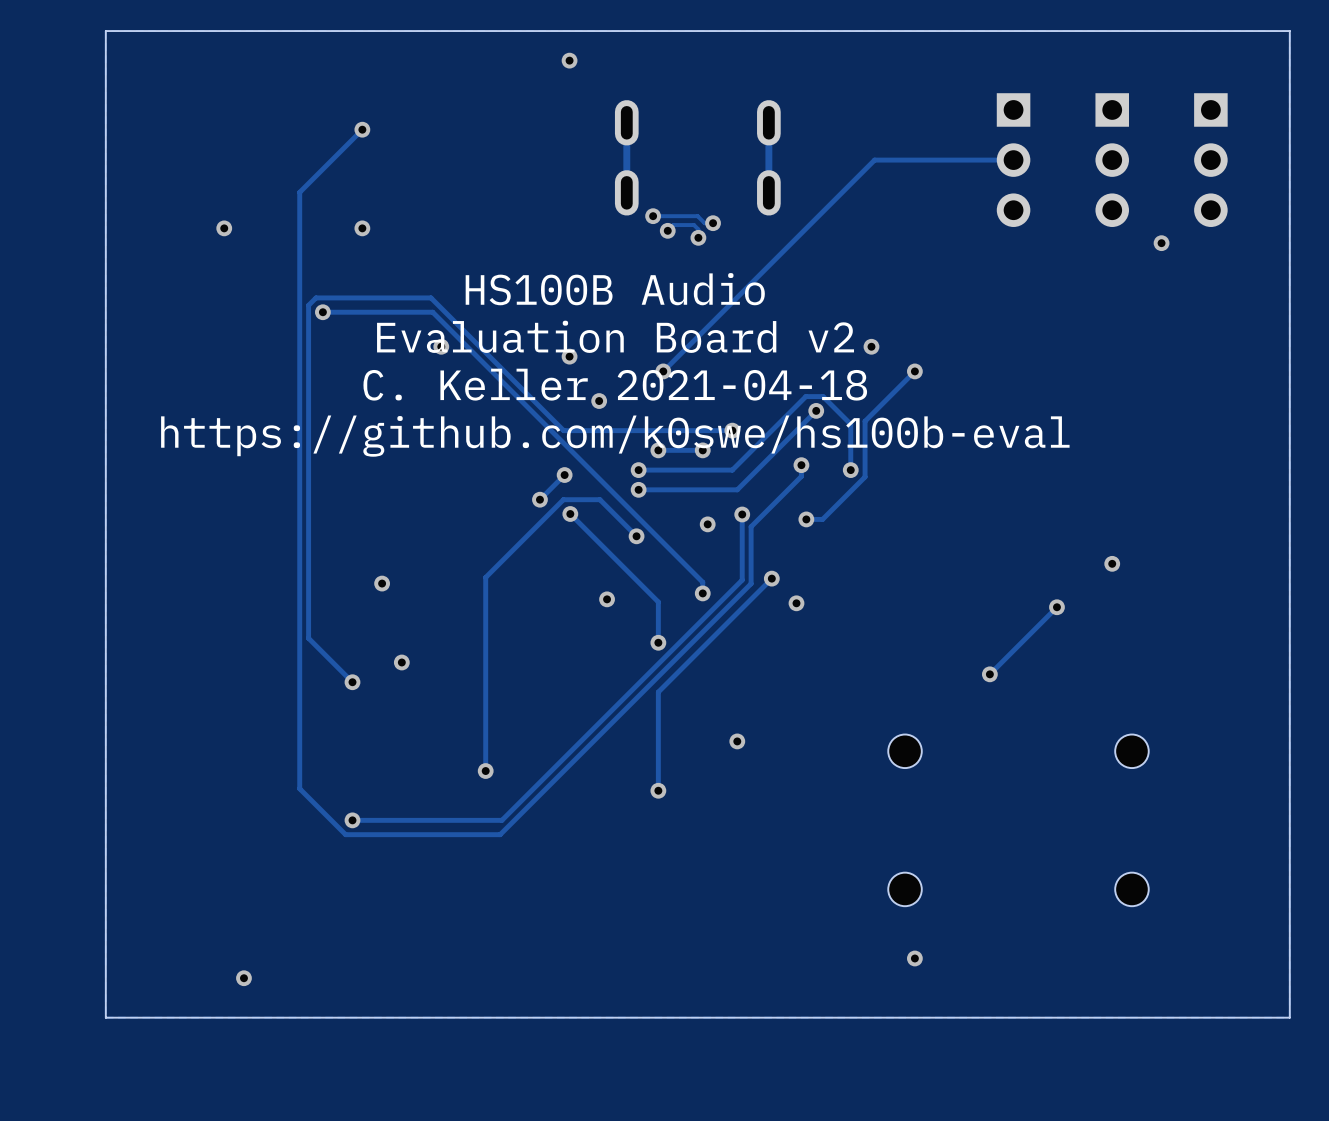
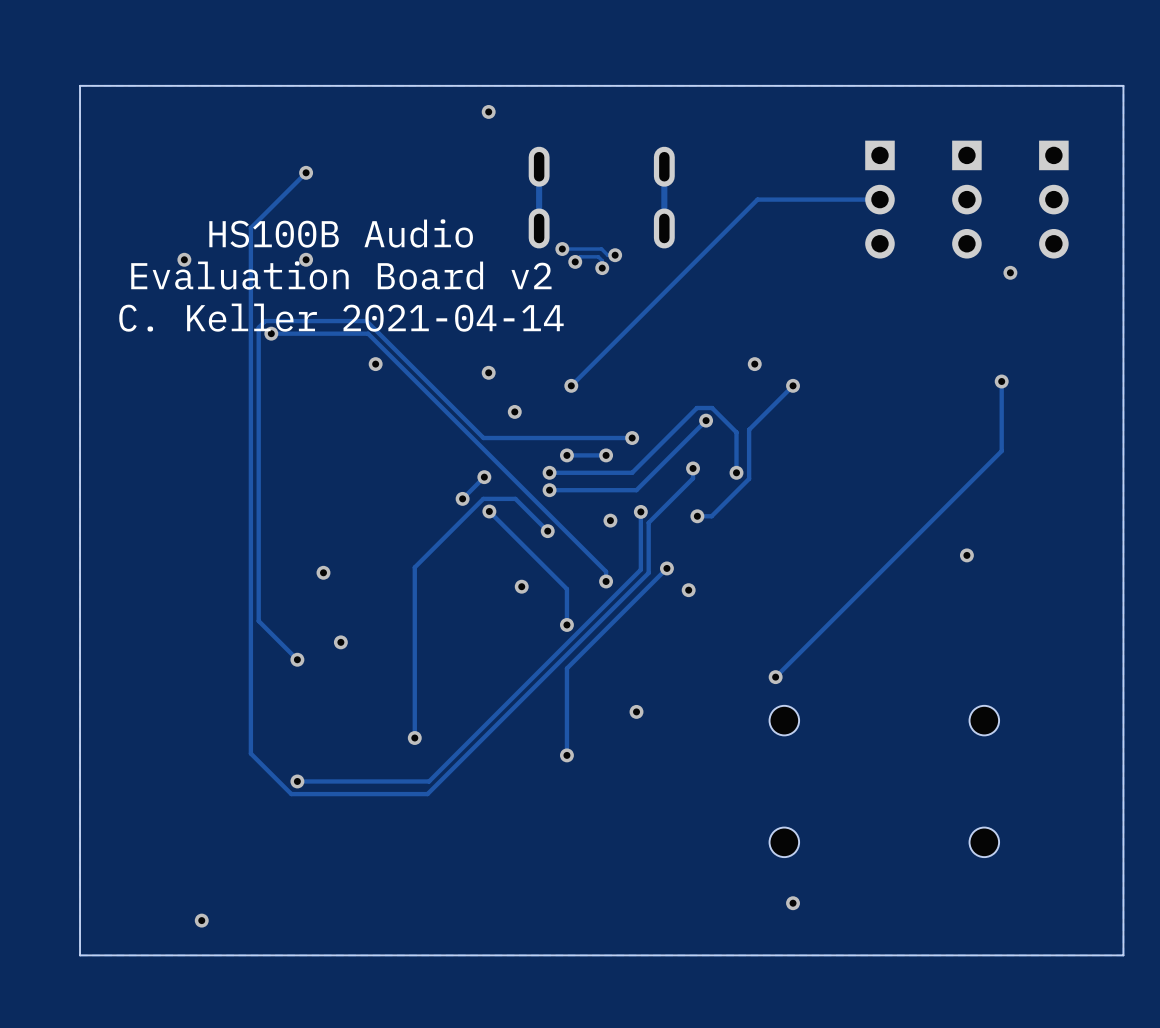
text position: HS100B Audio (615, 289) -> HS100B Audio (341, 233)
text: none -> C. Keller 2021-04-14 (341, 317)
text position: Evaluation Board v2 (615, 336) -> Evaluation Board v2 (341, 275)
track: none -> (1001, 381) (1001, 451) (775, 677)
via: none -> (1001, 381)
text: C. Keller 2021-04-18 (615, 384) -> none
text: https://github.com/k0swe/hs100b-eval (615, 436) -> none
track: (1056, 607) (989, 674) -> none
via: (1056, 607) -> none
via: (989, 674) -> none
via: none -> (775, 677)

